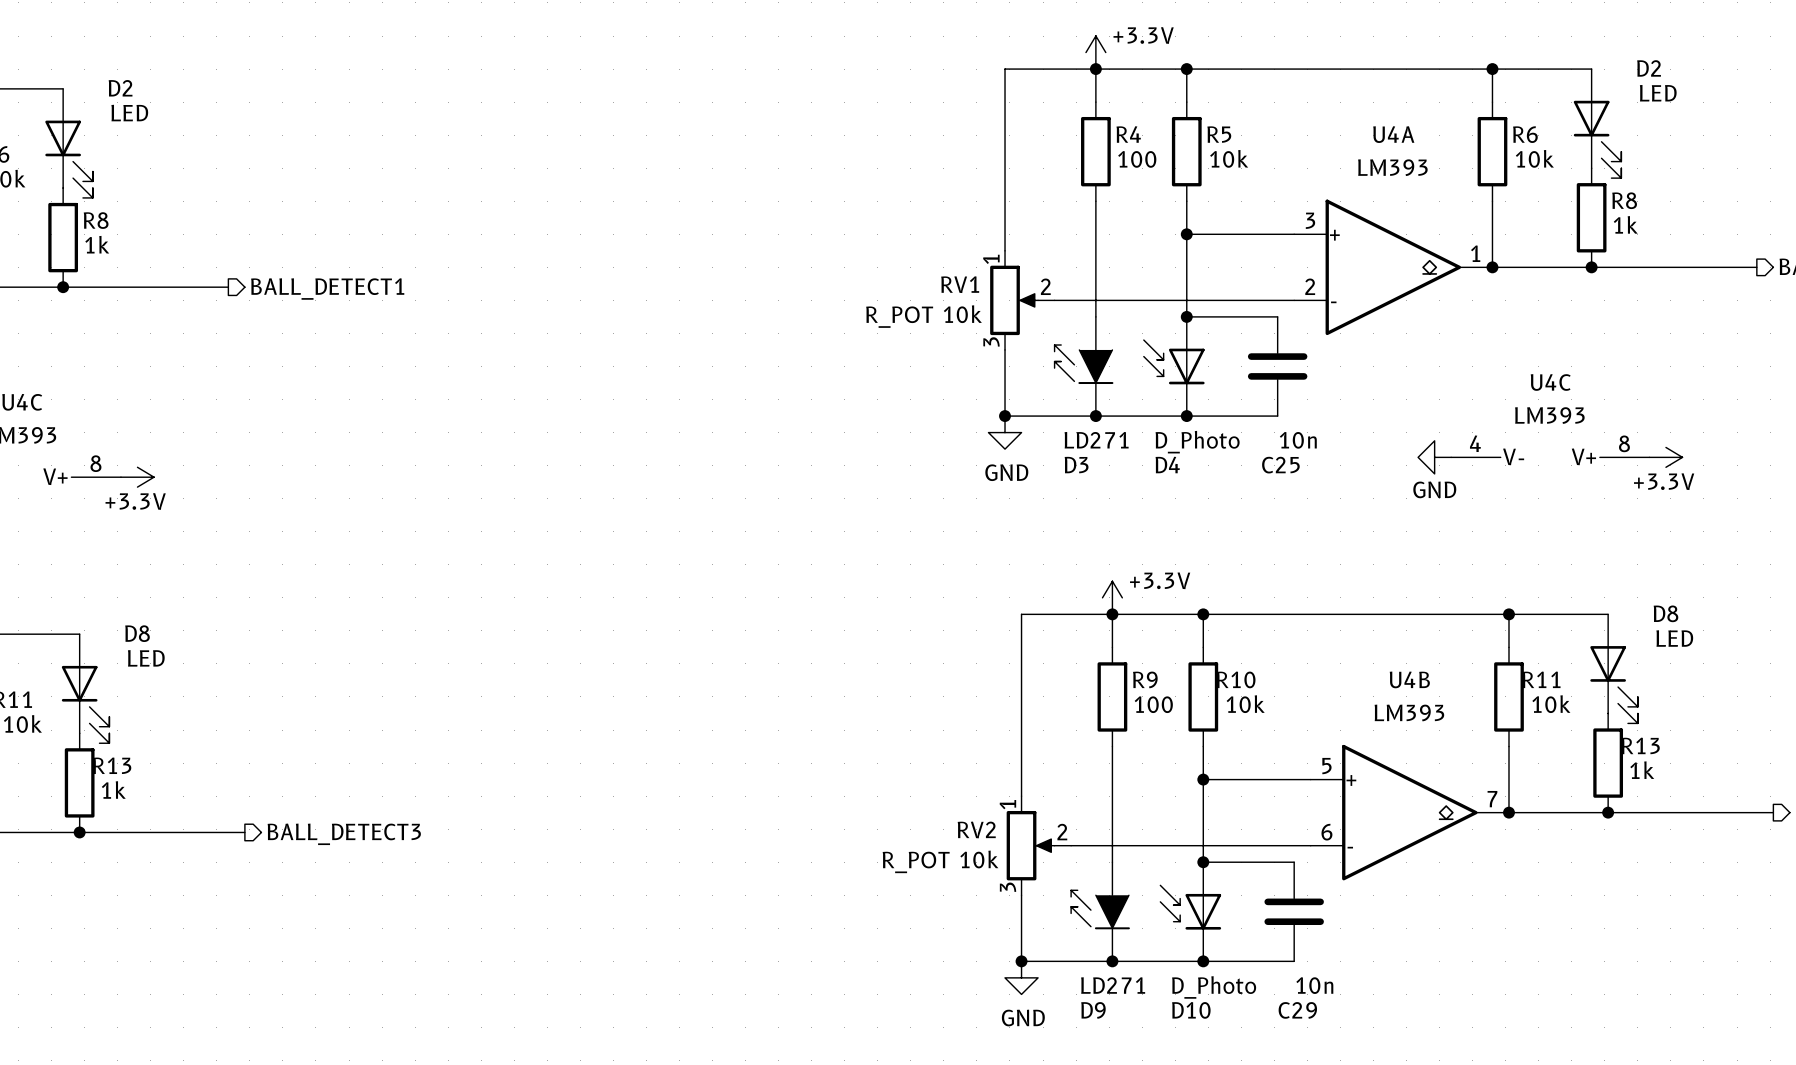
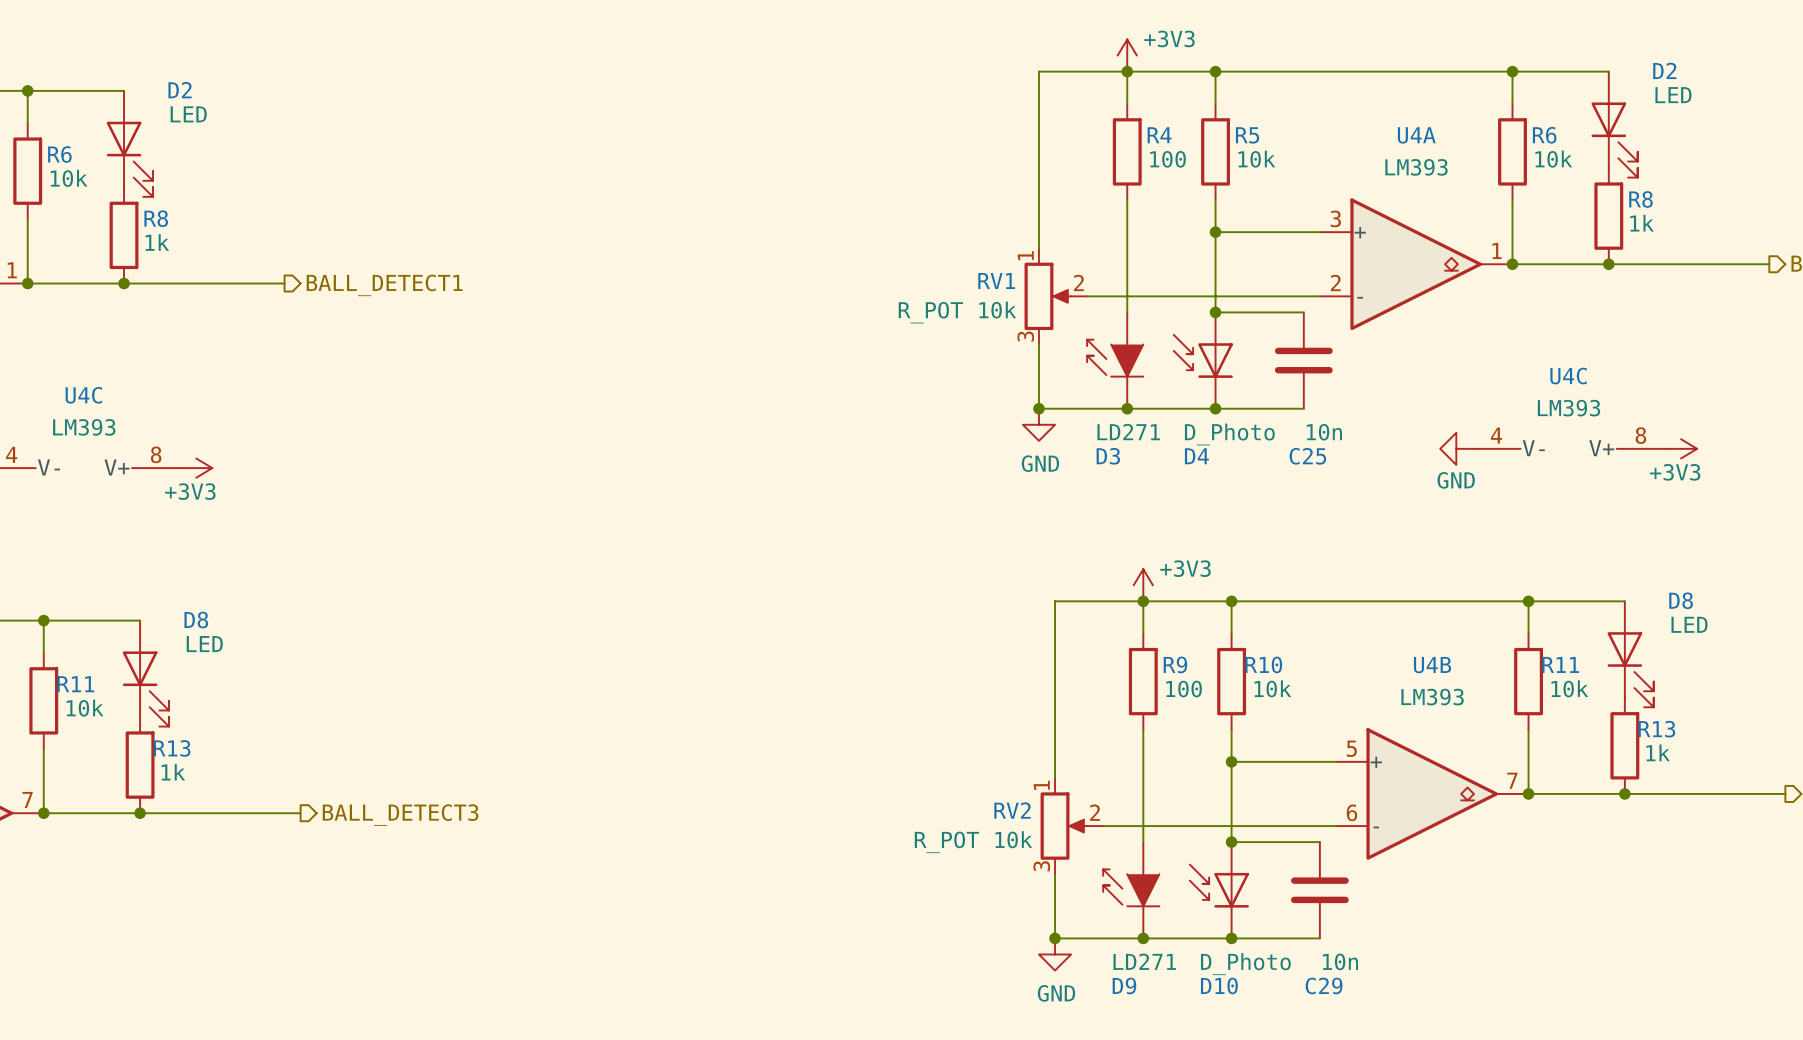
power symbol: +3.3V (1095, 52) -> +3V3 (1127, 55)
power symbol: +3.3V (1665, 457) -> +3V3 (1681, 448)
power symbol: +3.3V (137, 477) -> +3V3 (196, 468)
power symbol: +3.3V (1112, 597) -> +3V3 (1143, 585)

